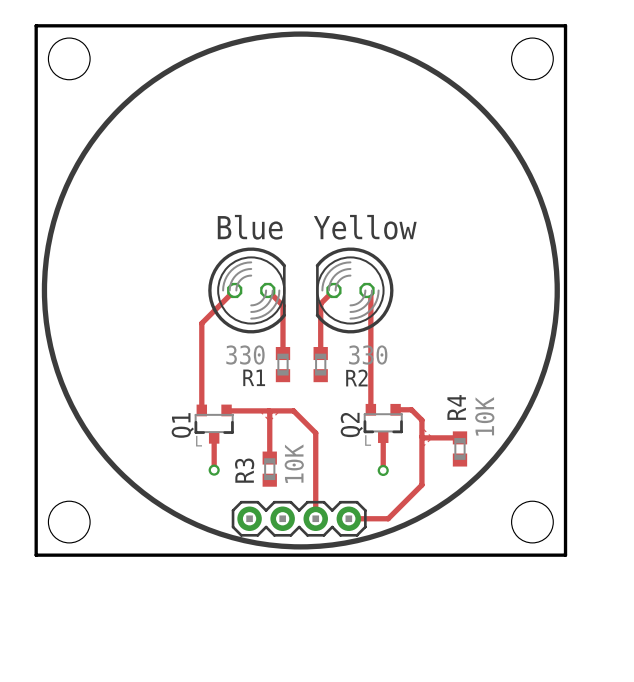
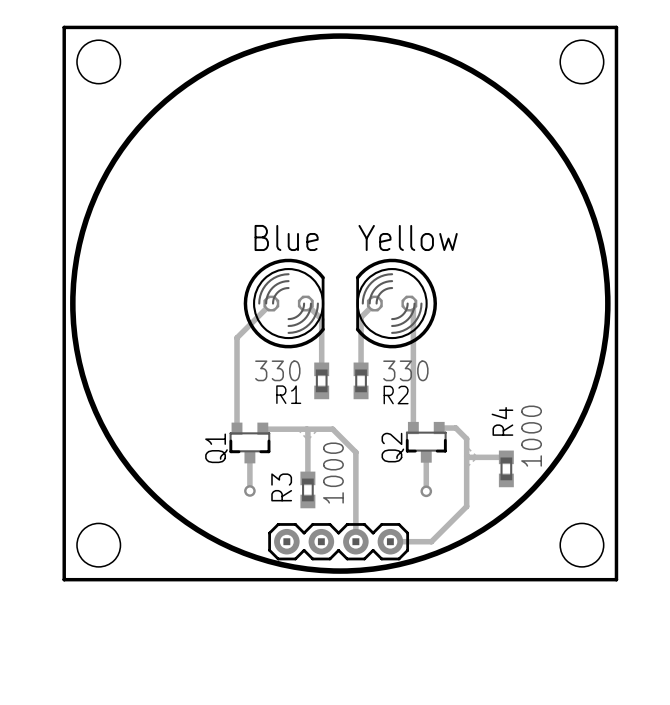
R4 value: 10K (484, 416) -> 1000 (531, 436)
Q2 text: L (368, 440) -> none
Q1 text: L (199, 441) -> none
R3 value: 10K (294, 463) -> 1000 (333, 473)

